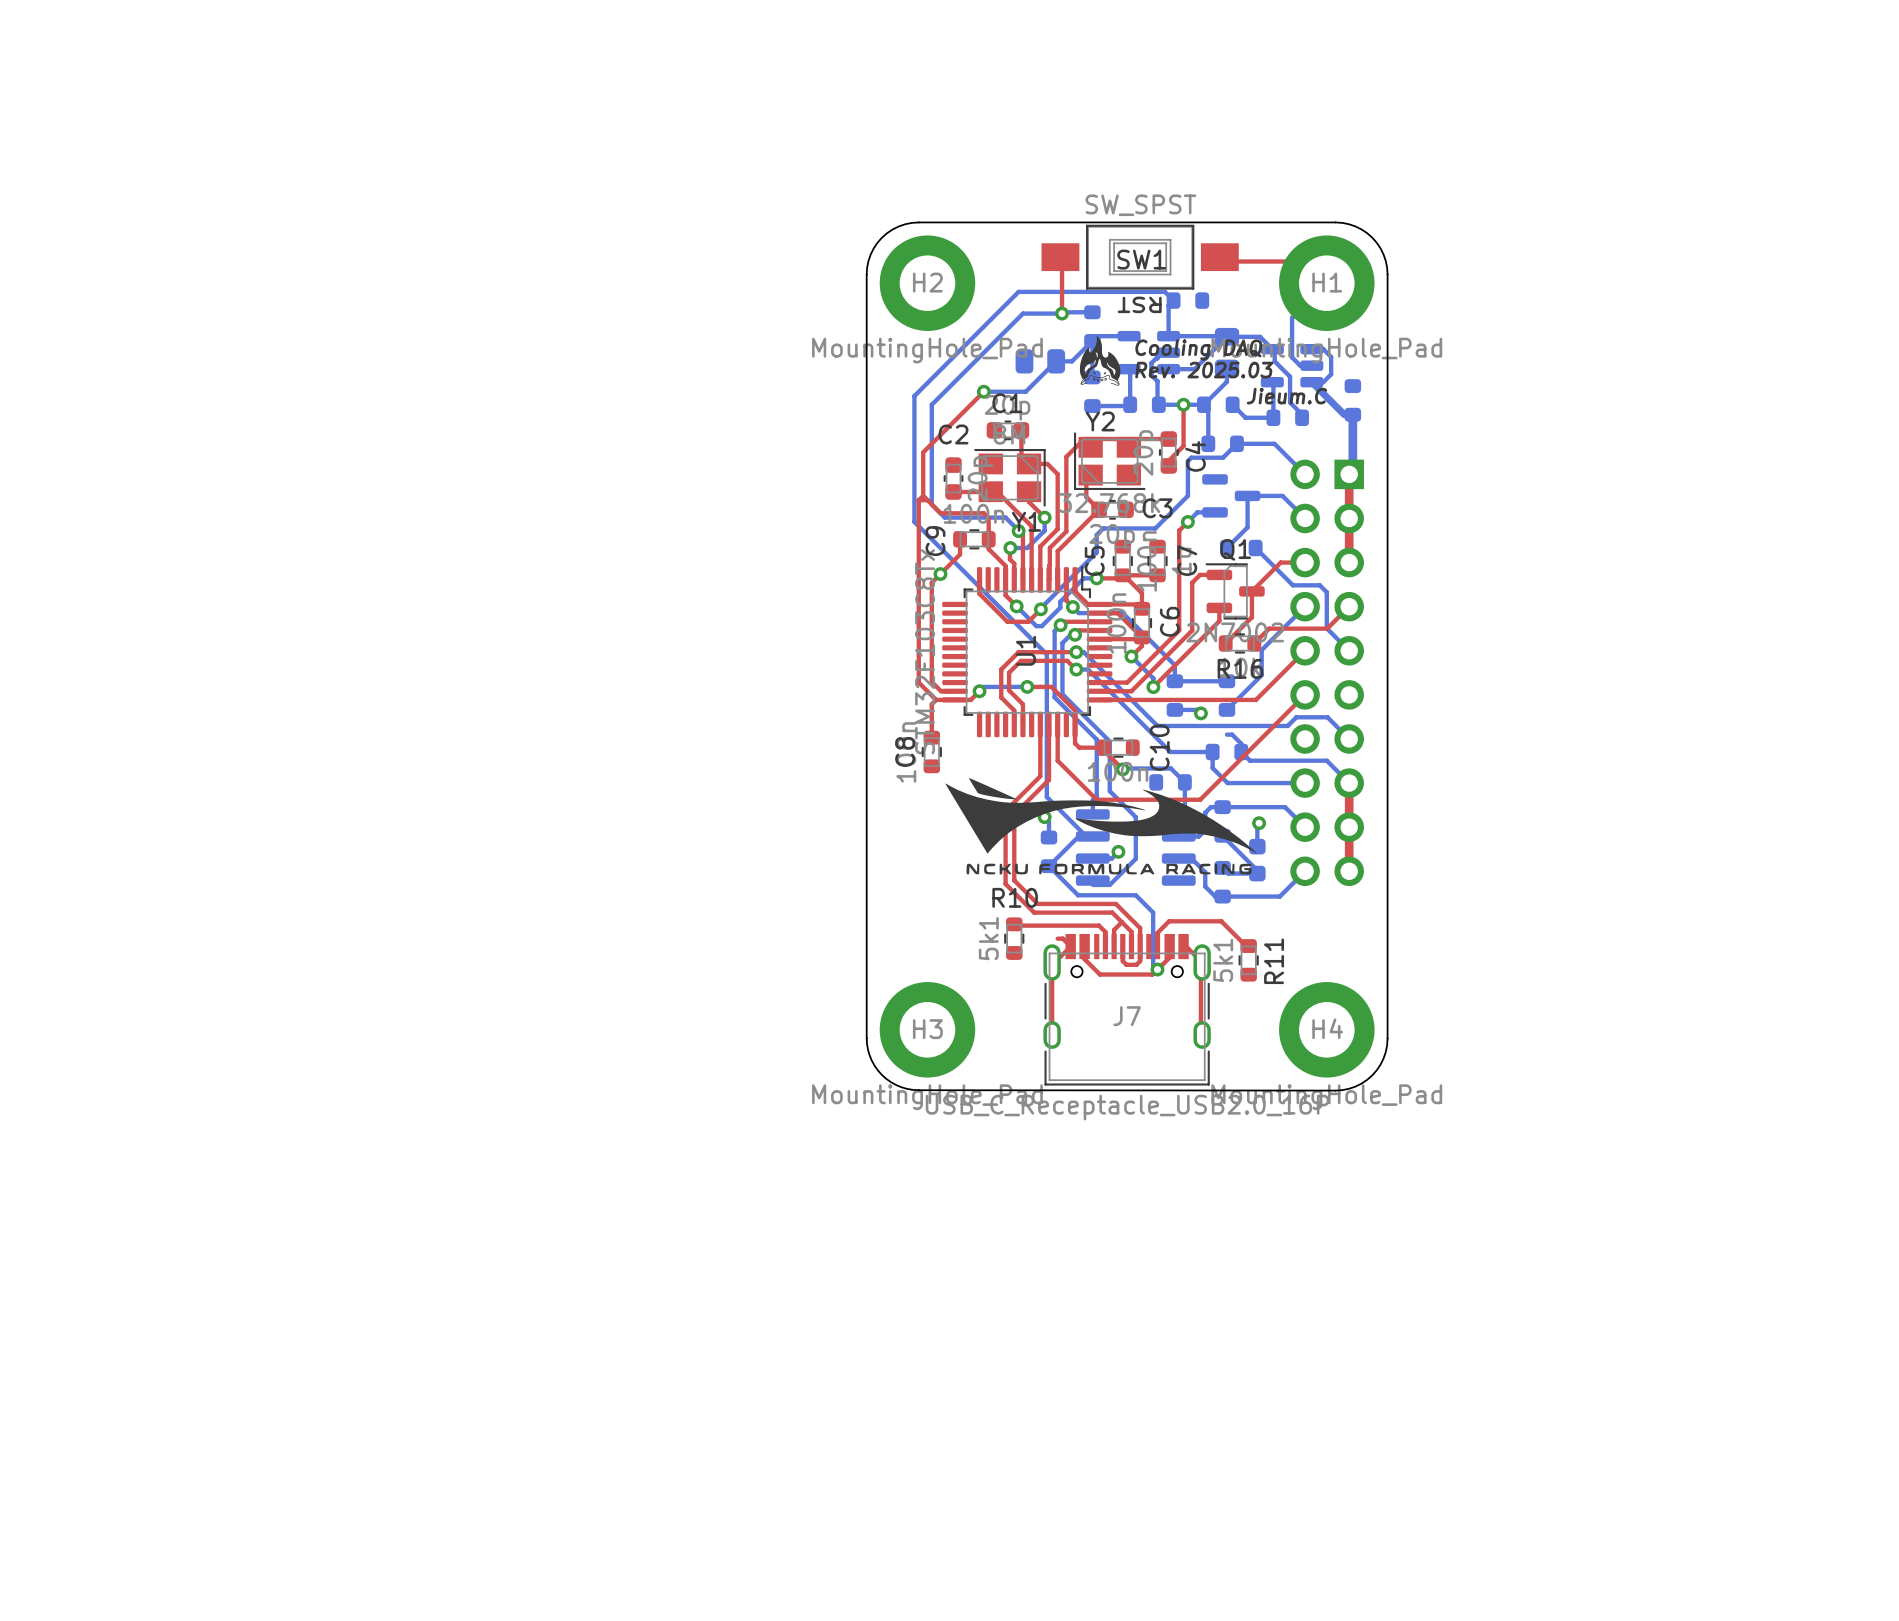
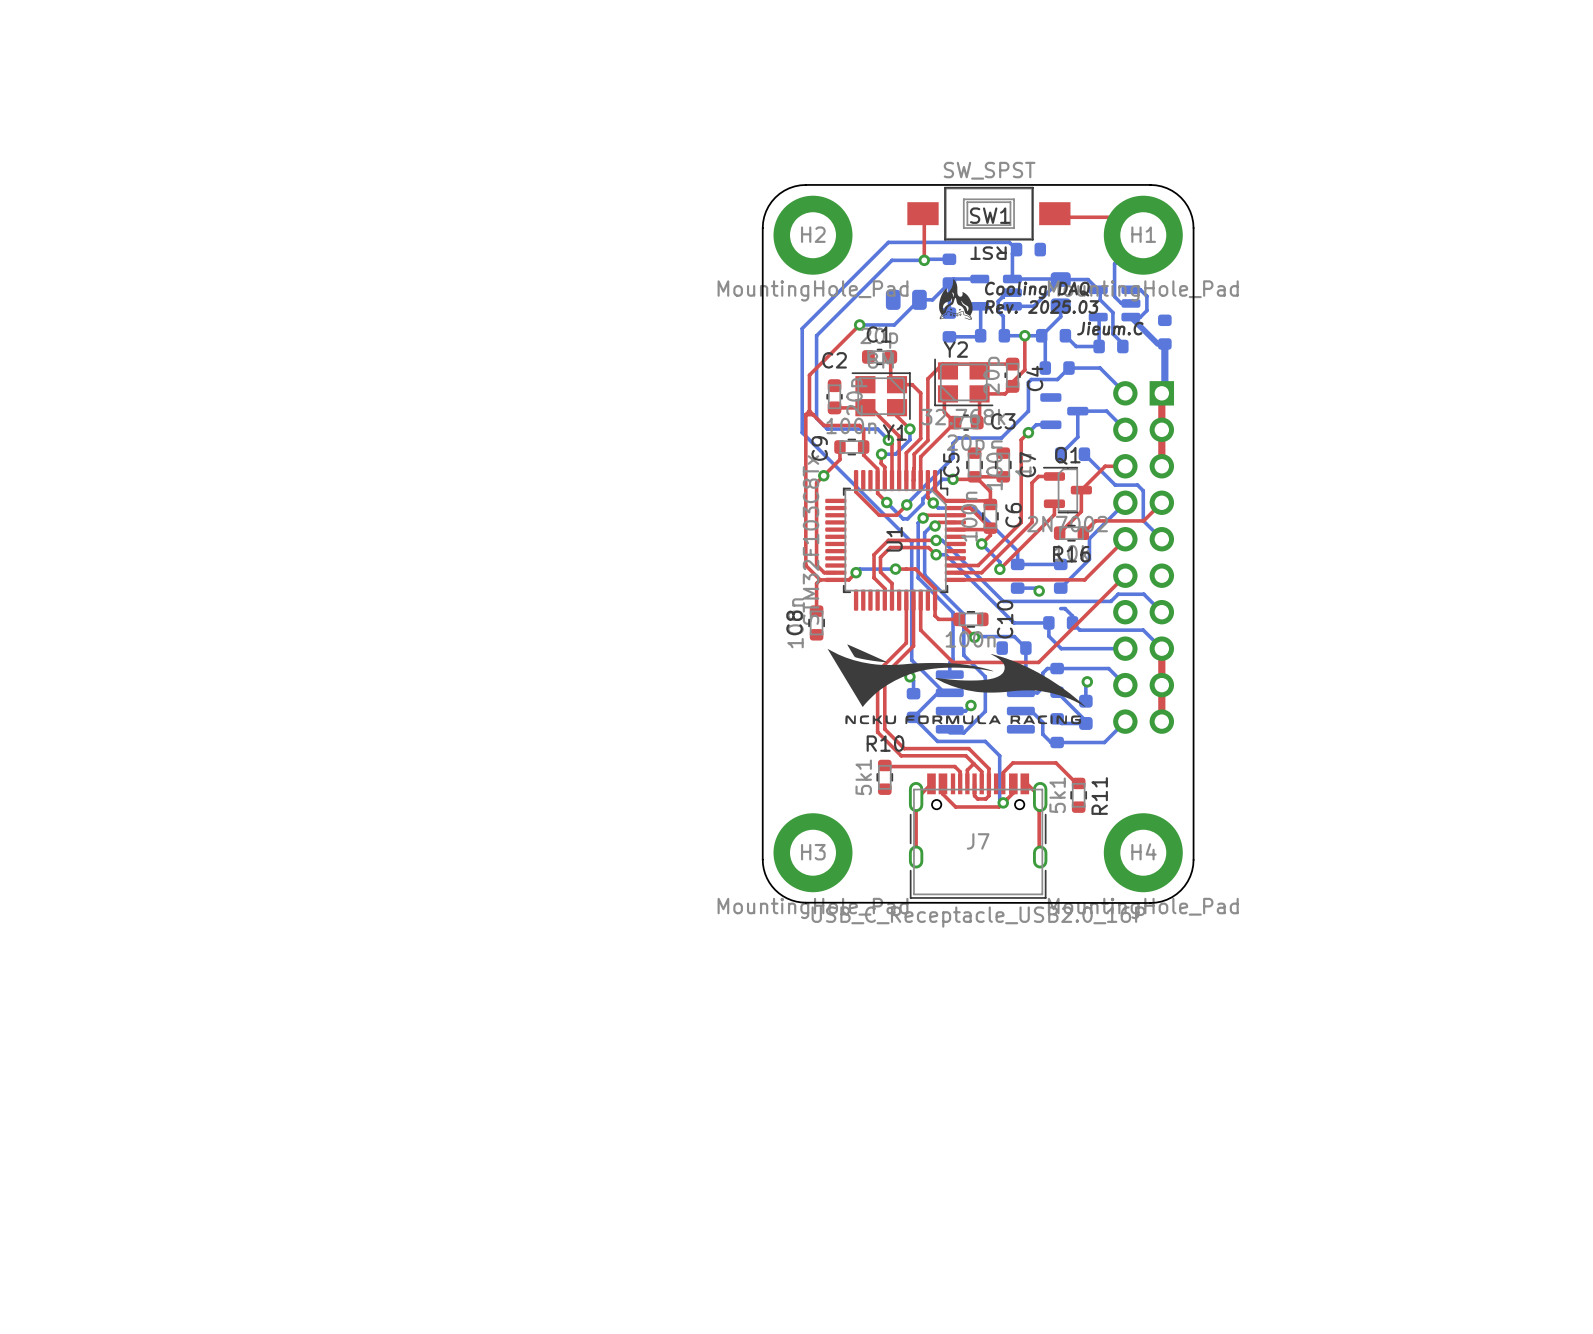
top track: none -> (1012, 386) (1005, 393) (979, 393) (979, 420) (977, 422)
top track: (1057, 938) (1062, 938) (1070, 946) -> none

